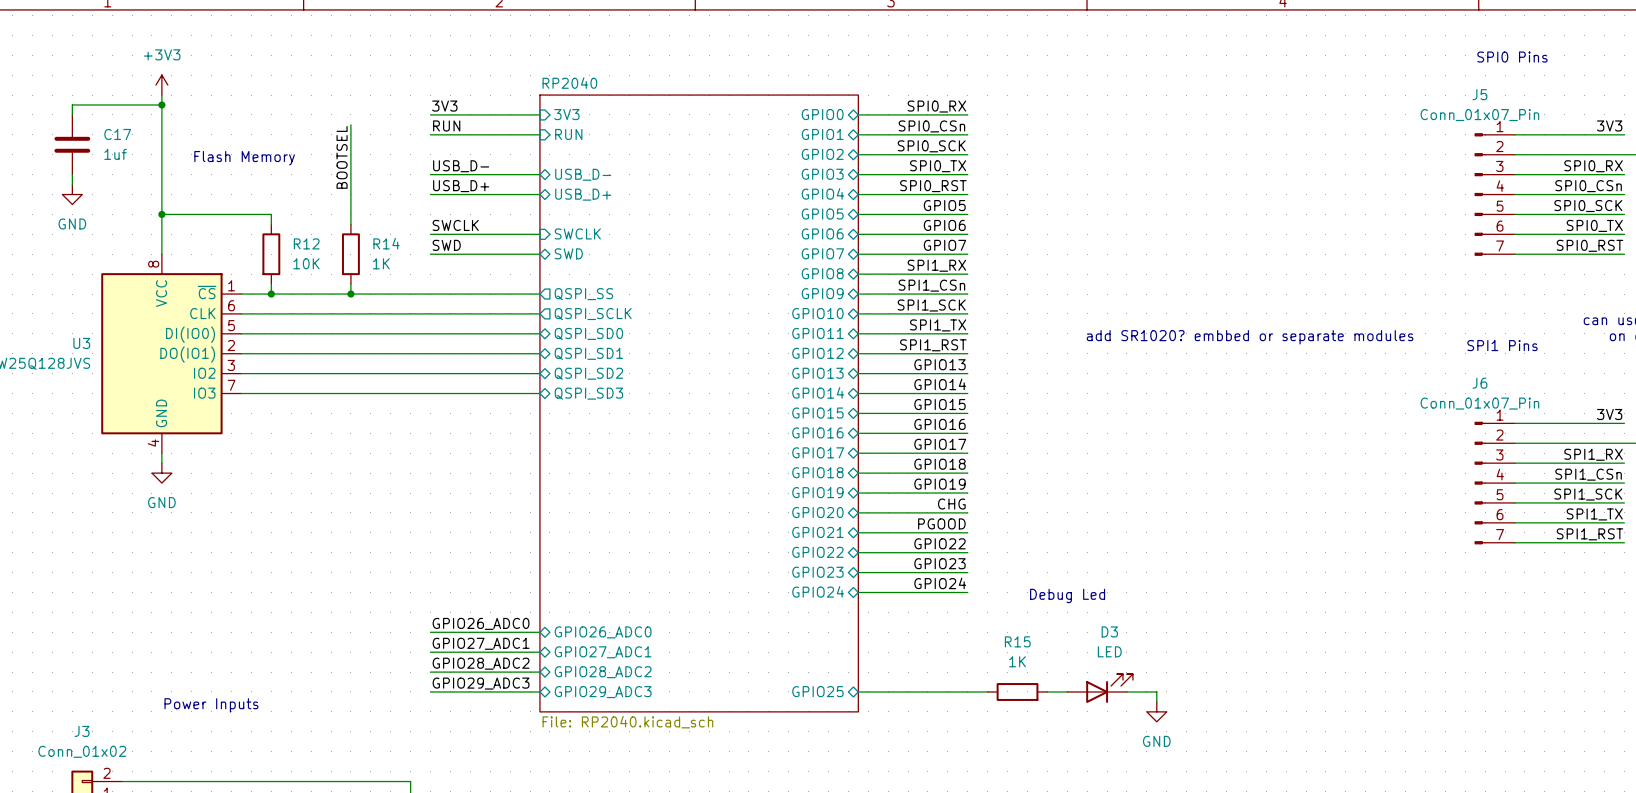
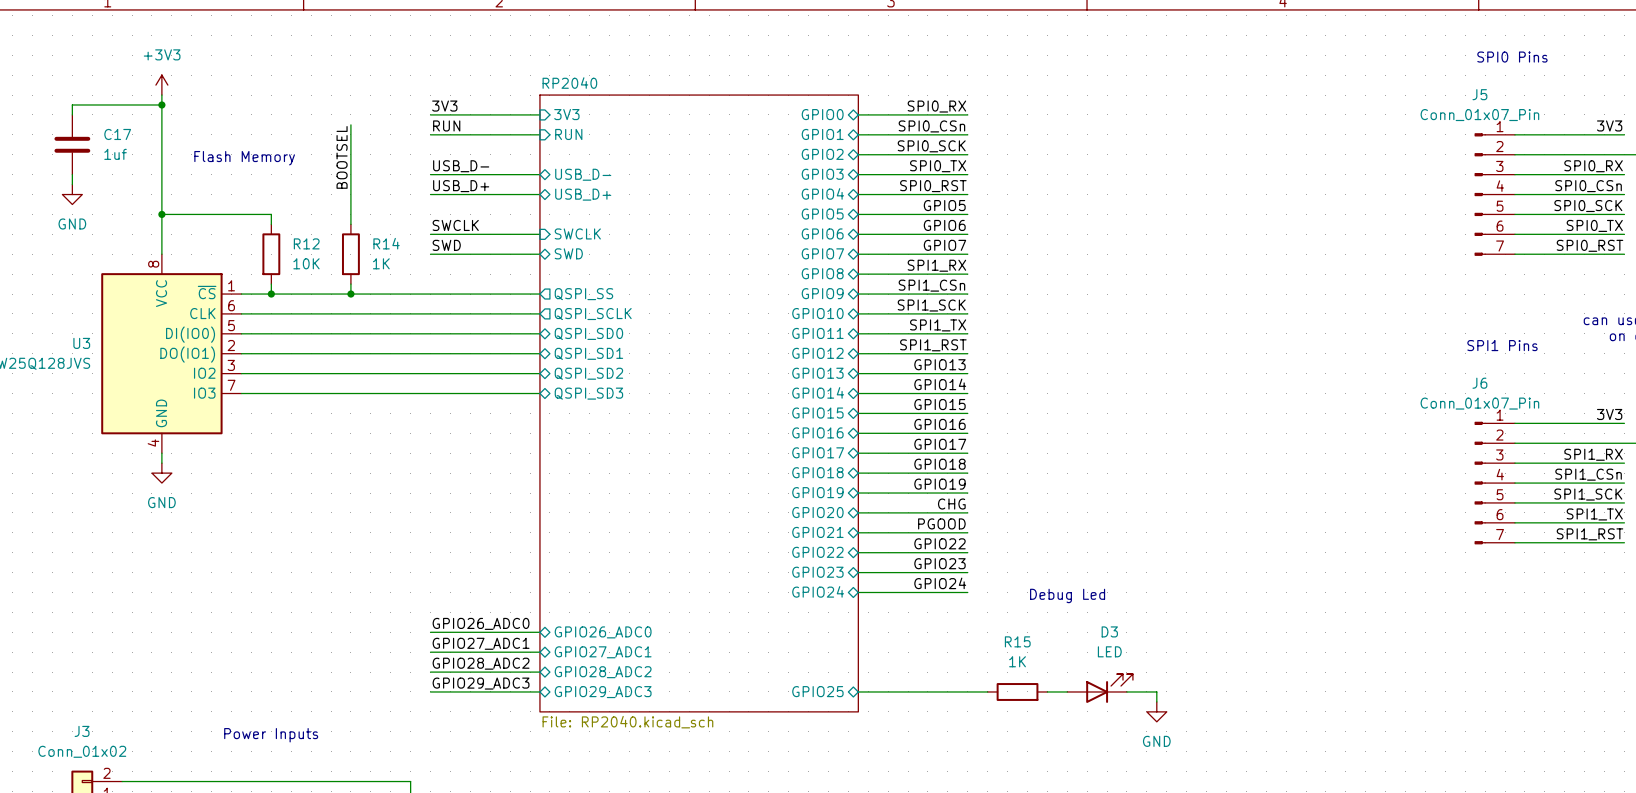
text: add SR1020? embbed or separate modules (1250, 337) -> none
text position: Power Inputs (211, 705) -> Power Inputs (271, 735)

